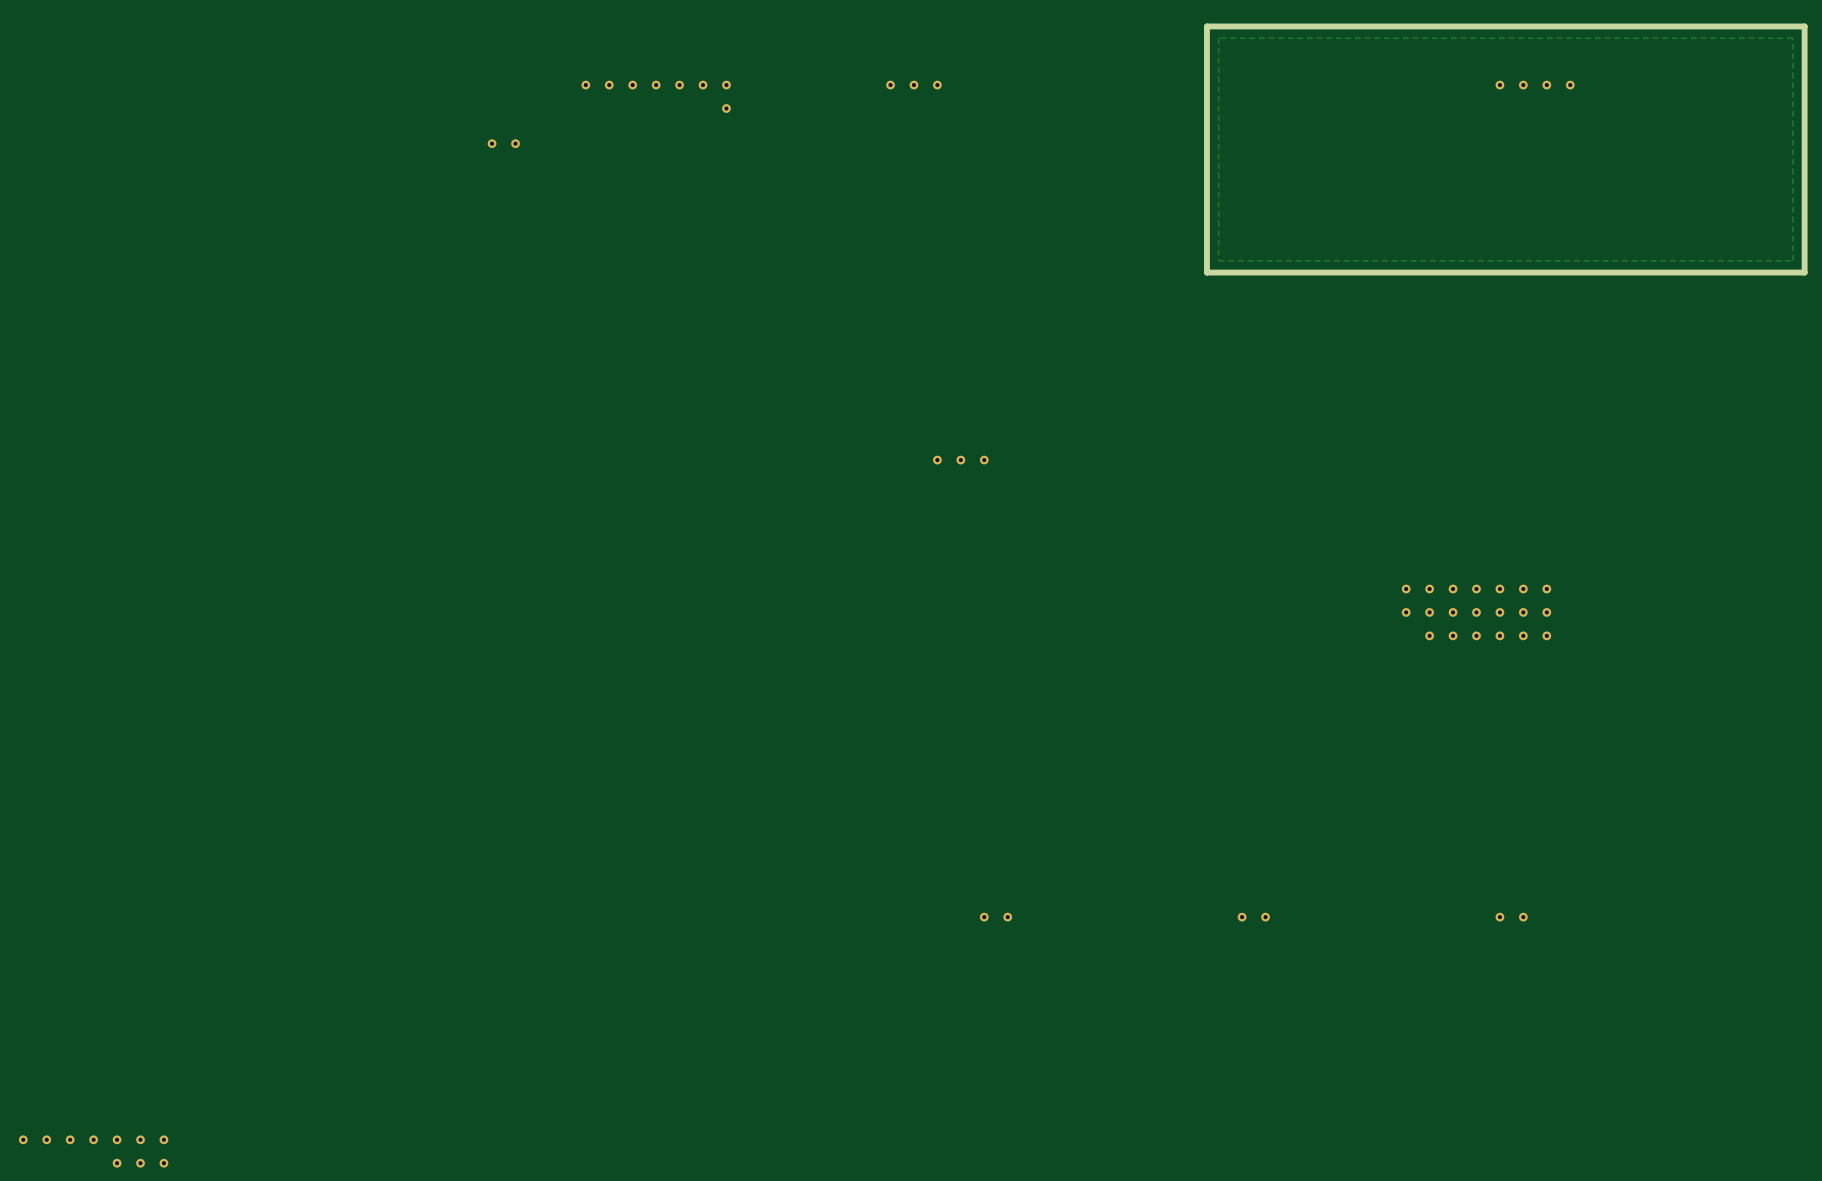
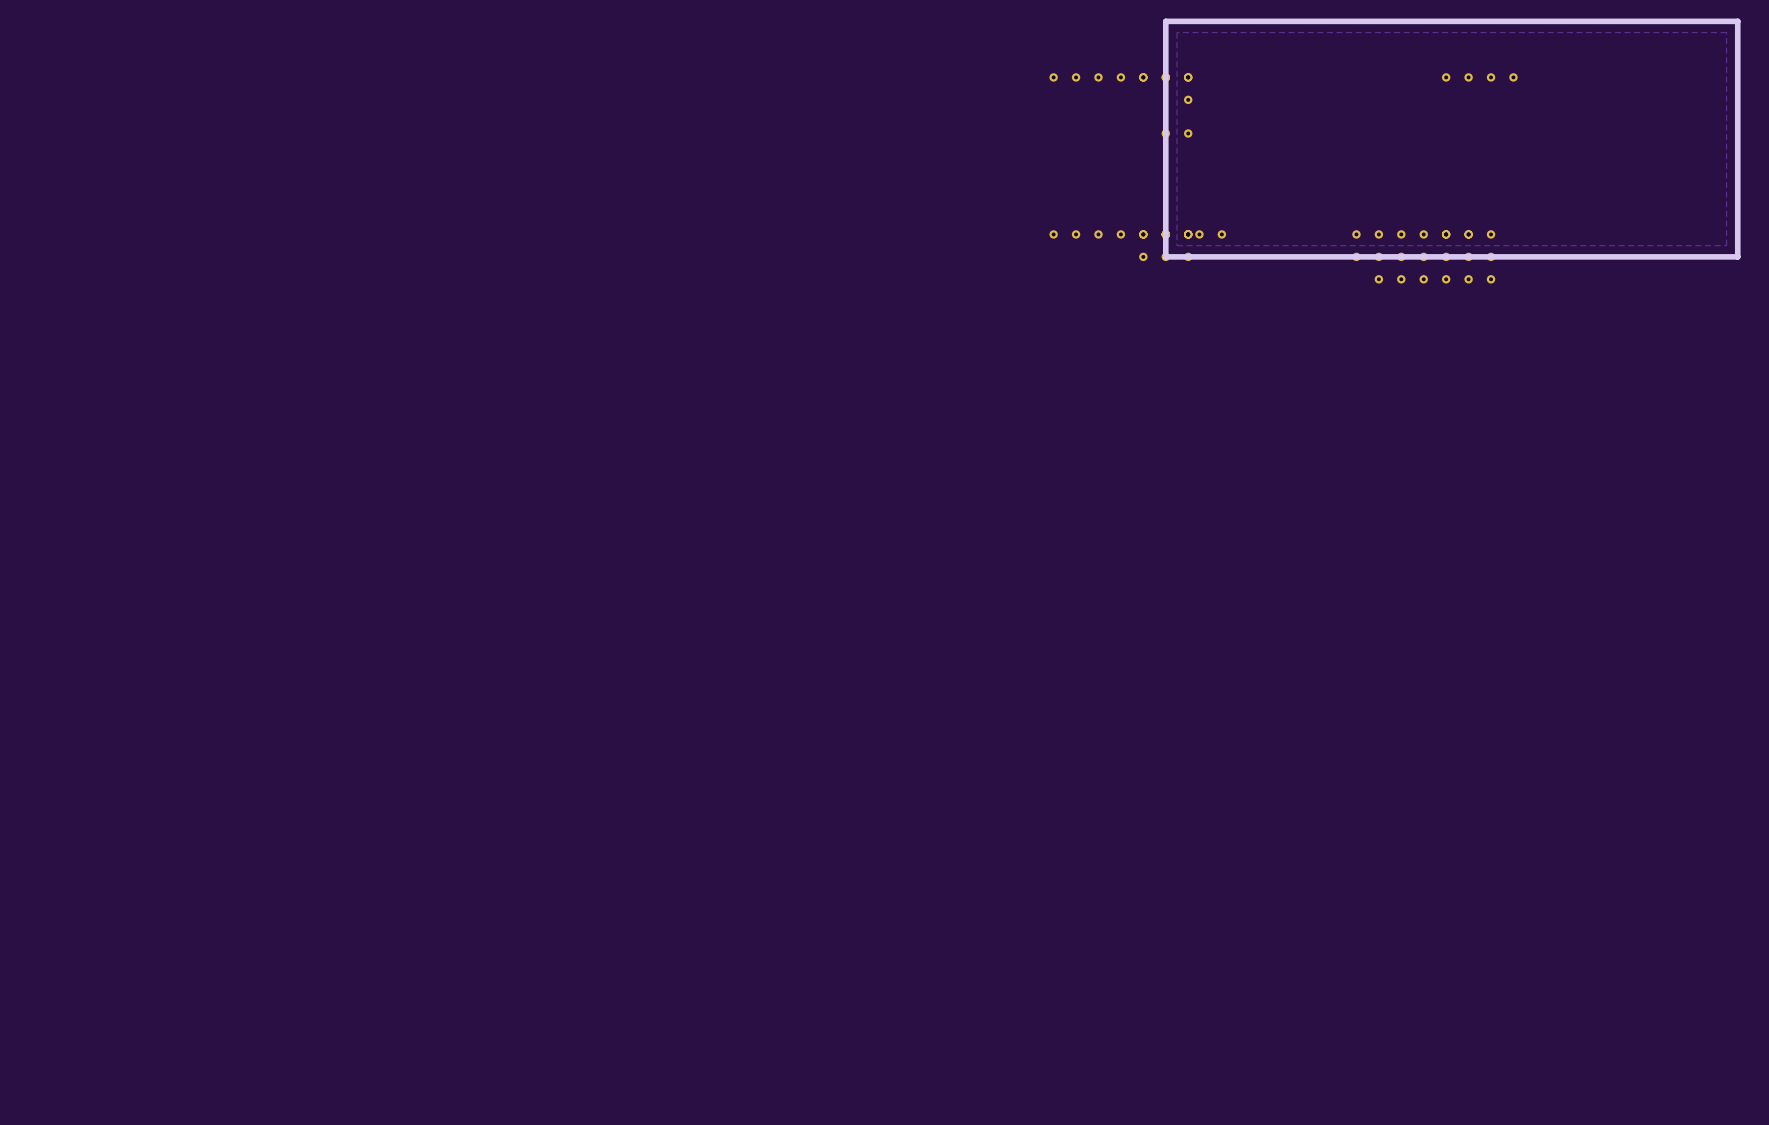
part: (913, 85) -> none
part: none -> (1165, 77)
part: (656, 96) -> none
part: none -> (1120, 88)
part: (503, 143) -> none
part: none -> (1177, 133)
part: none -> (1165, 234)
part: none -> (1177, 234)
part: none -> (1210, 234)
part: none -> (1457, 234)
part: none -> (1120, 245)
part: none -> (1423, 256)
part: (960, 460) -> none
part: (1476, 612) -> none
part: (995, 917) -> none
part: (1253, 917) -> none
part: (1511, 917) -> none
part: (93, 1151) -> none

